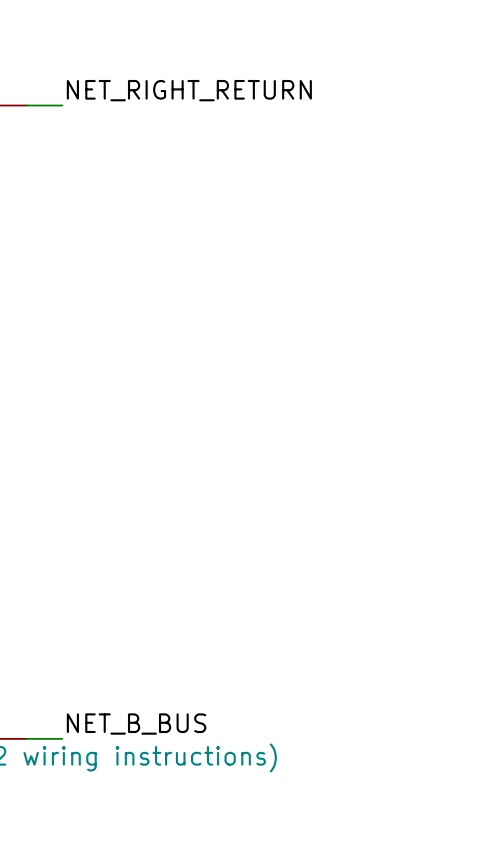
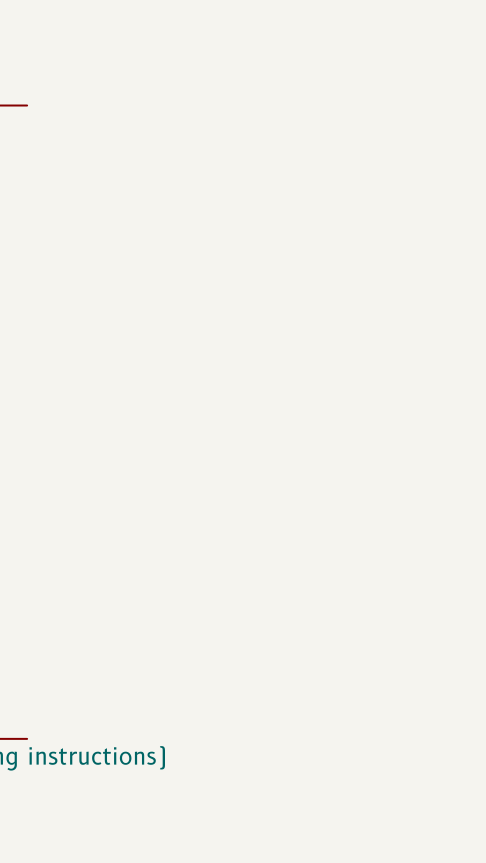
label: NET_RIGHT_RETURN (189, 90) -> none
wire: (27, 105) (62, 105) -> none
label: NET_B_BUS (136, 724) -> none
wire: (27, 738) (62, 738) -> none

